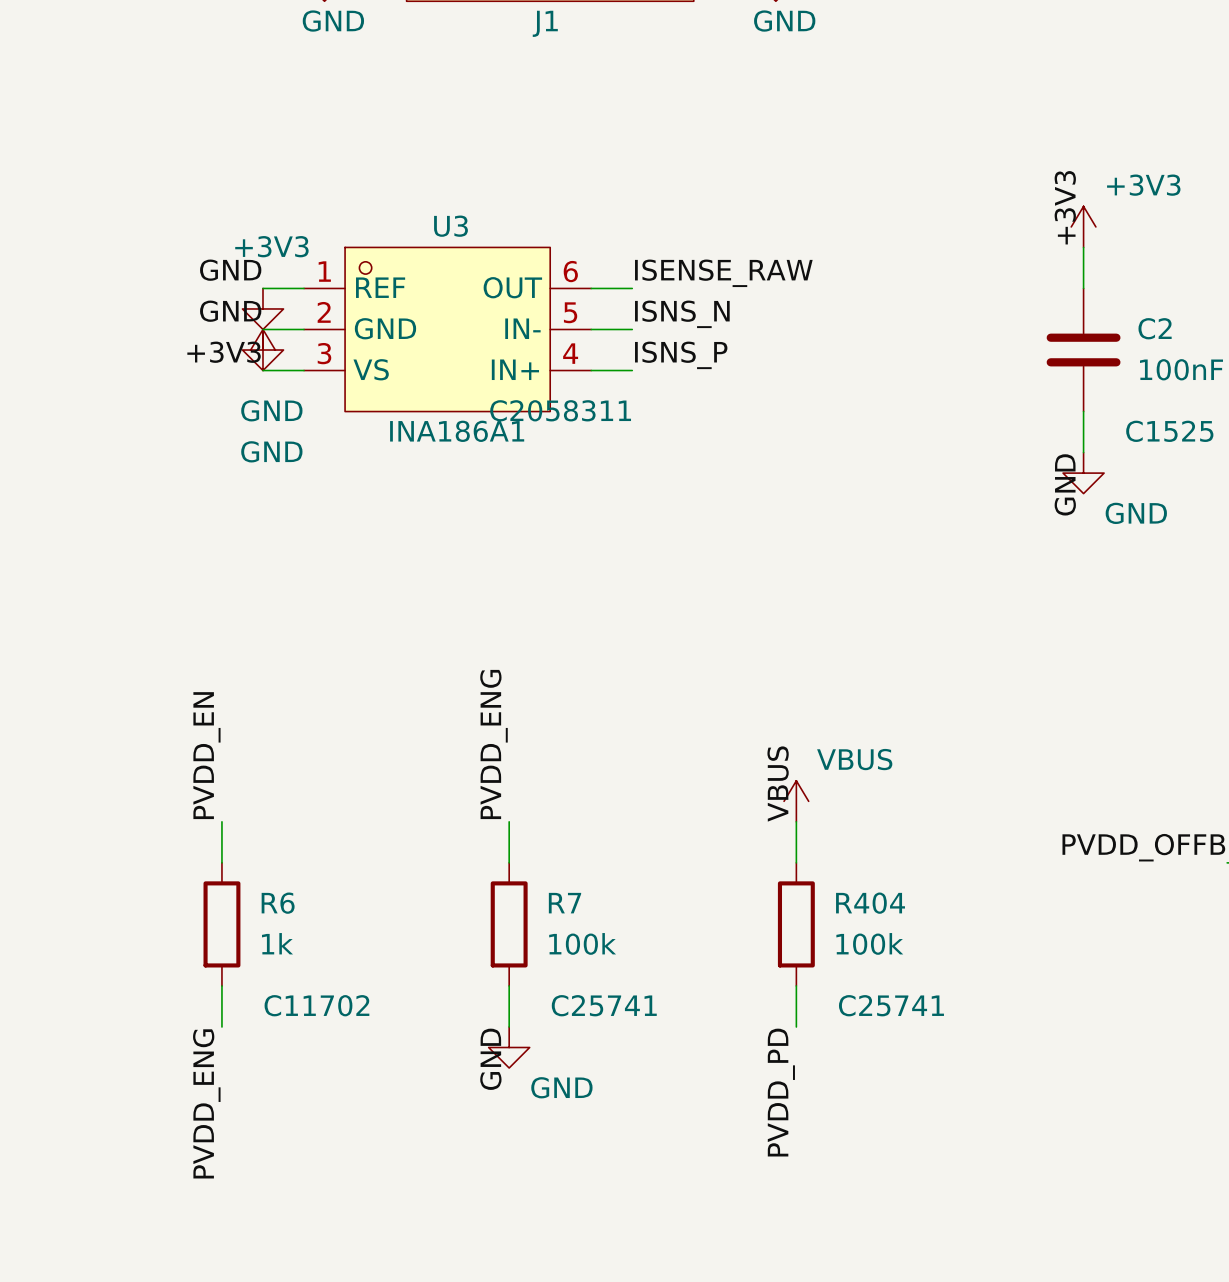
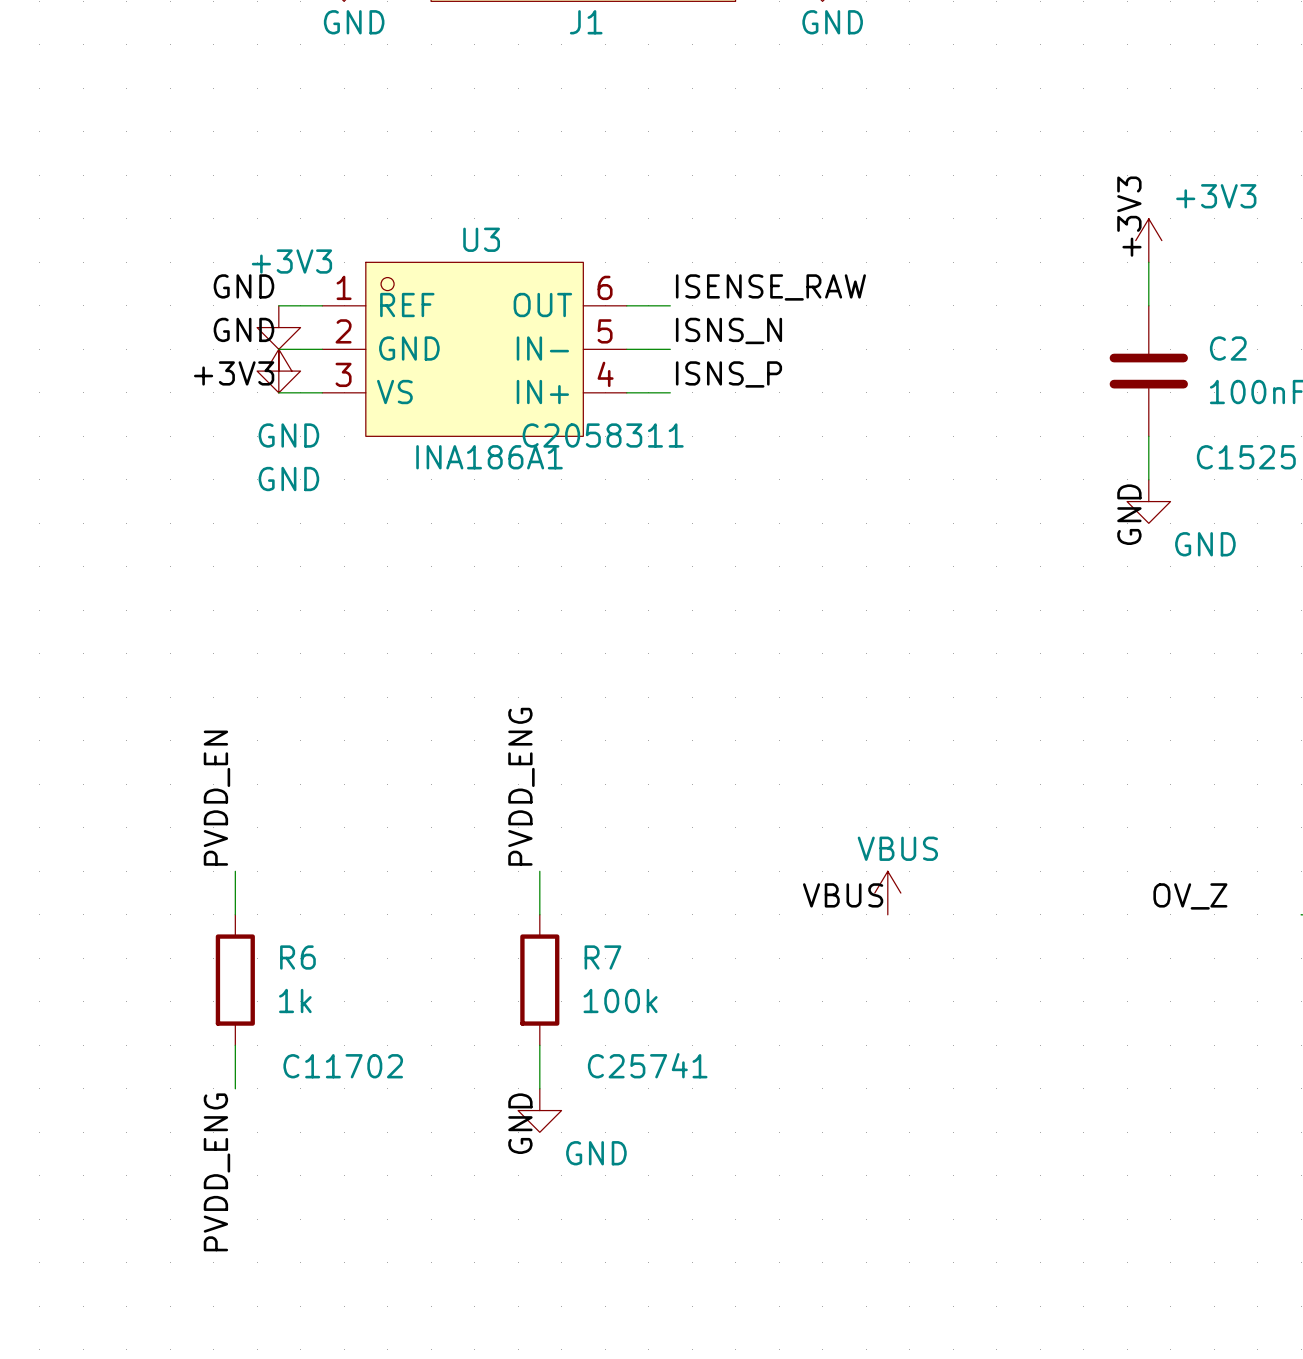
power symbol text position: VBUS (854, 759) -> VBUS (897, 848)
label rotation: 0° (778, 784) -> 90° clockwise (843, 895)
power symbol position: VBUS (796, 801) -> VBUS (887, 893)
wire: (796, 821) (796, 862) -> none
label: none -> OV_Z (1190, 896)
label: PVDD_OFFB (1143, 847) -> none
R404: 100k (796, 924) -> none
wire: (796, 985) (796, 1026) -> none
label: PVDD_PD (781, 1092) -> none

